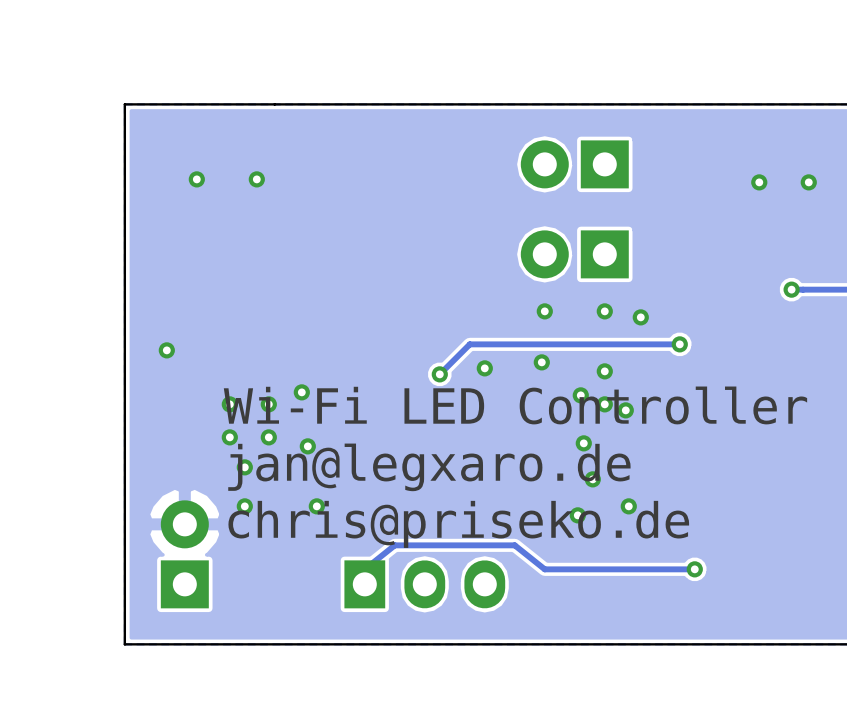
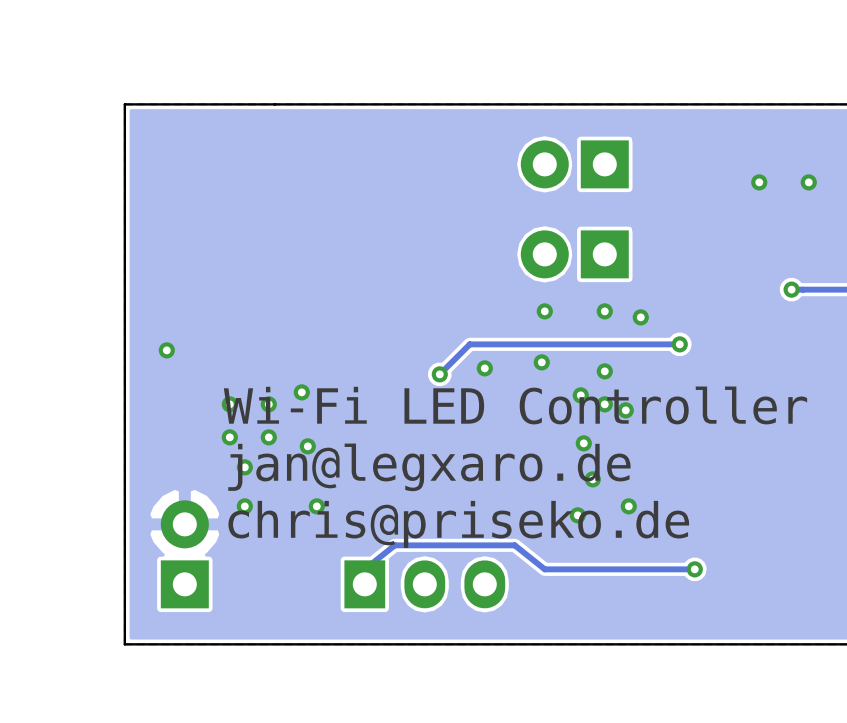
via: (196, 179) -> none
via: (256, 179) -> none

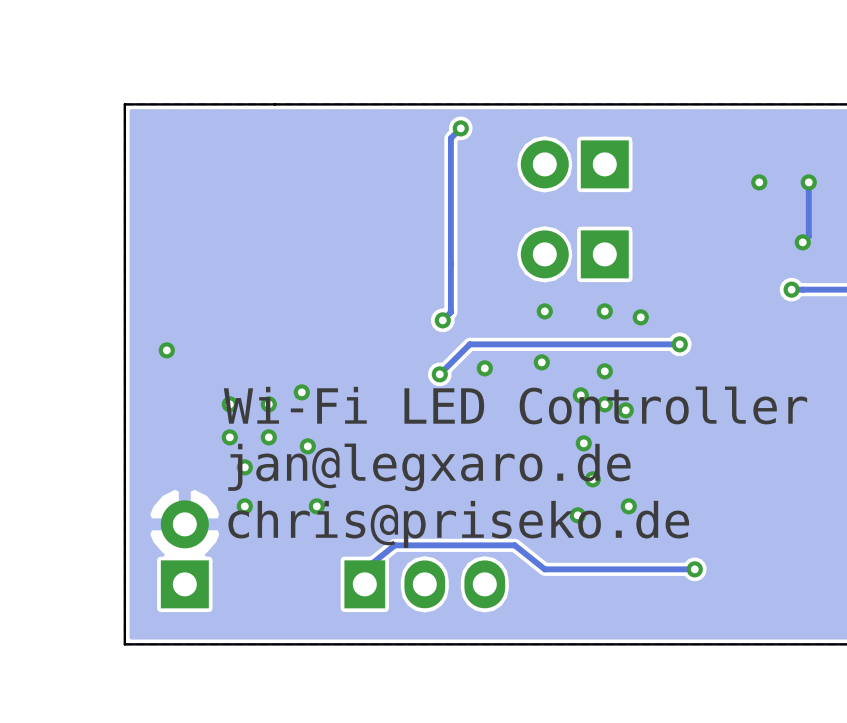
track: none -> (460, 128) (450, 138) (450, 312) (442, 320)
via: none -> (460, 128)
track: none -> (808, 182) (808, 236) (802, 242)
via: none -> (802, 242)
via: none -> (442, 320)

